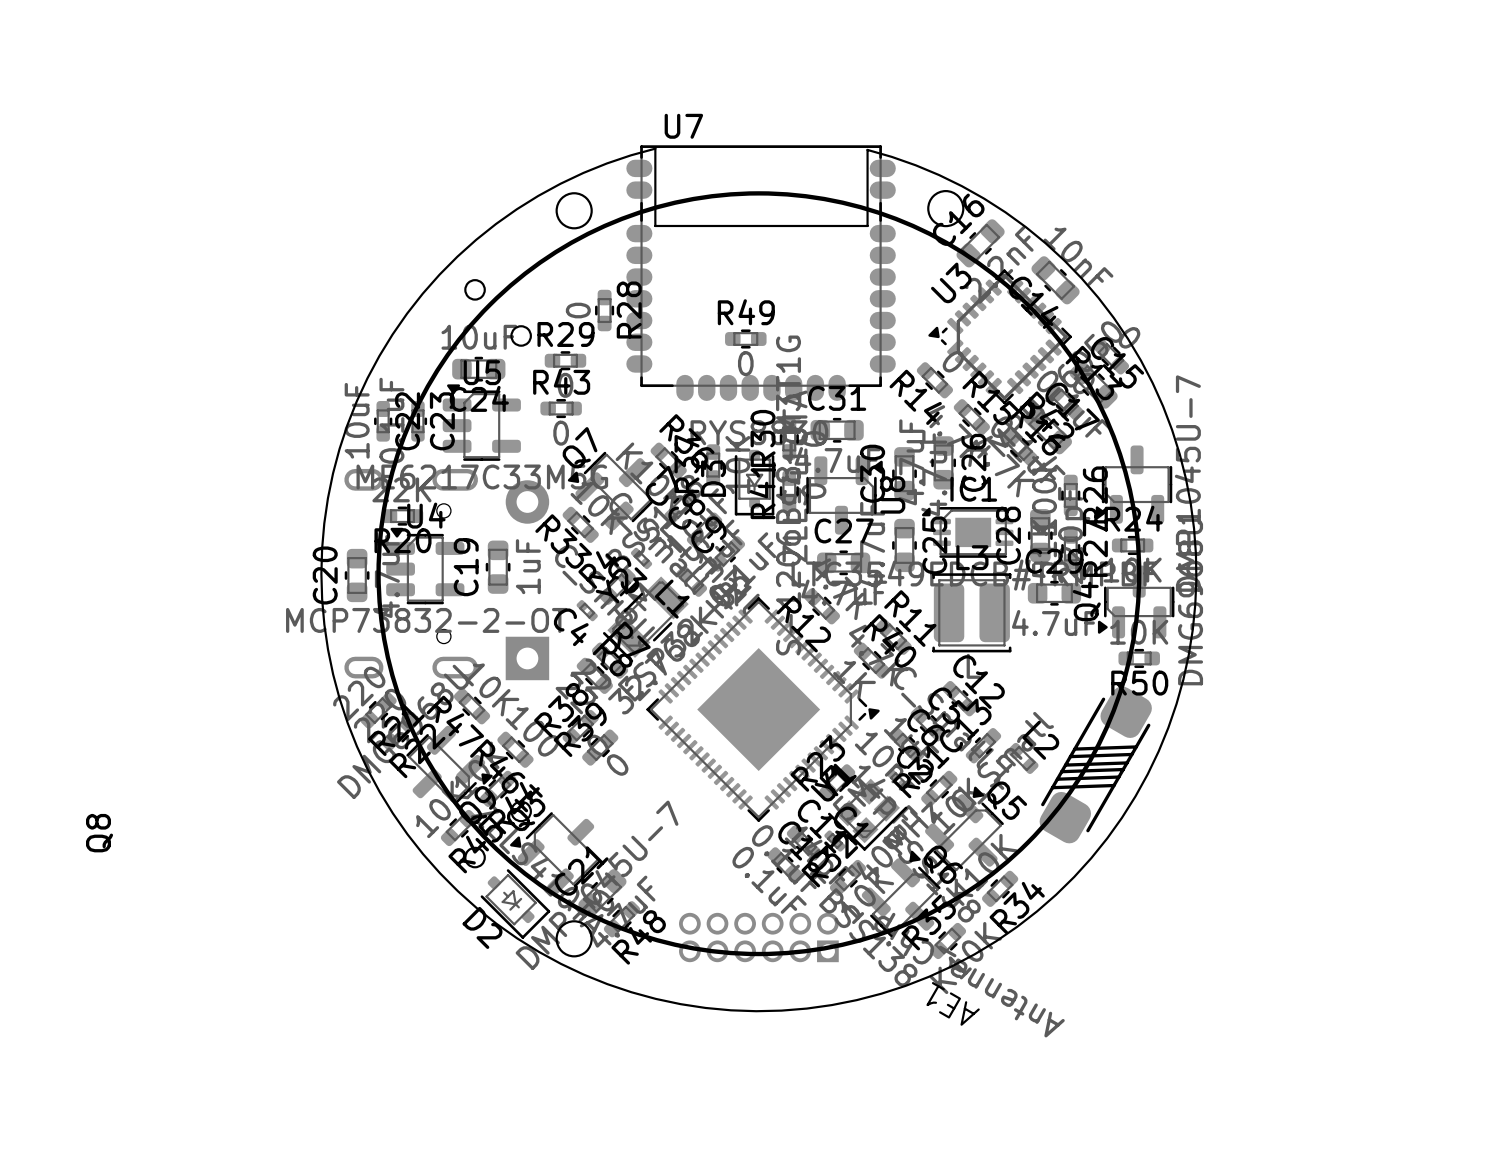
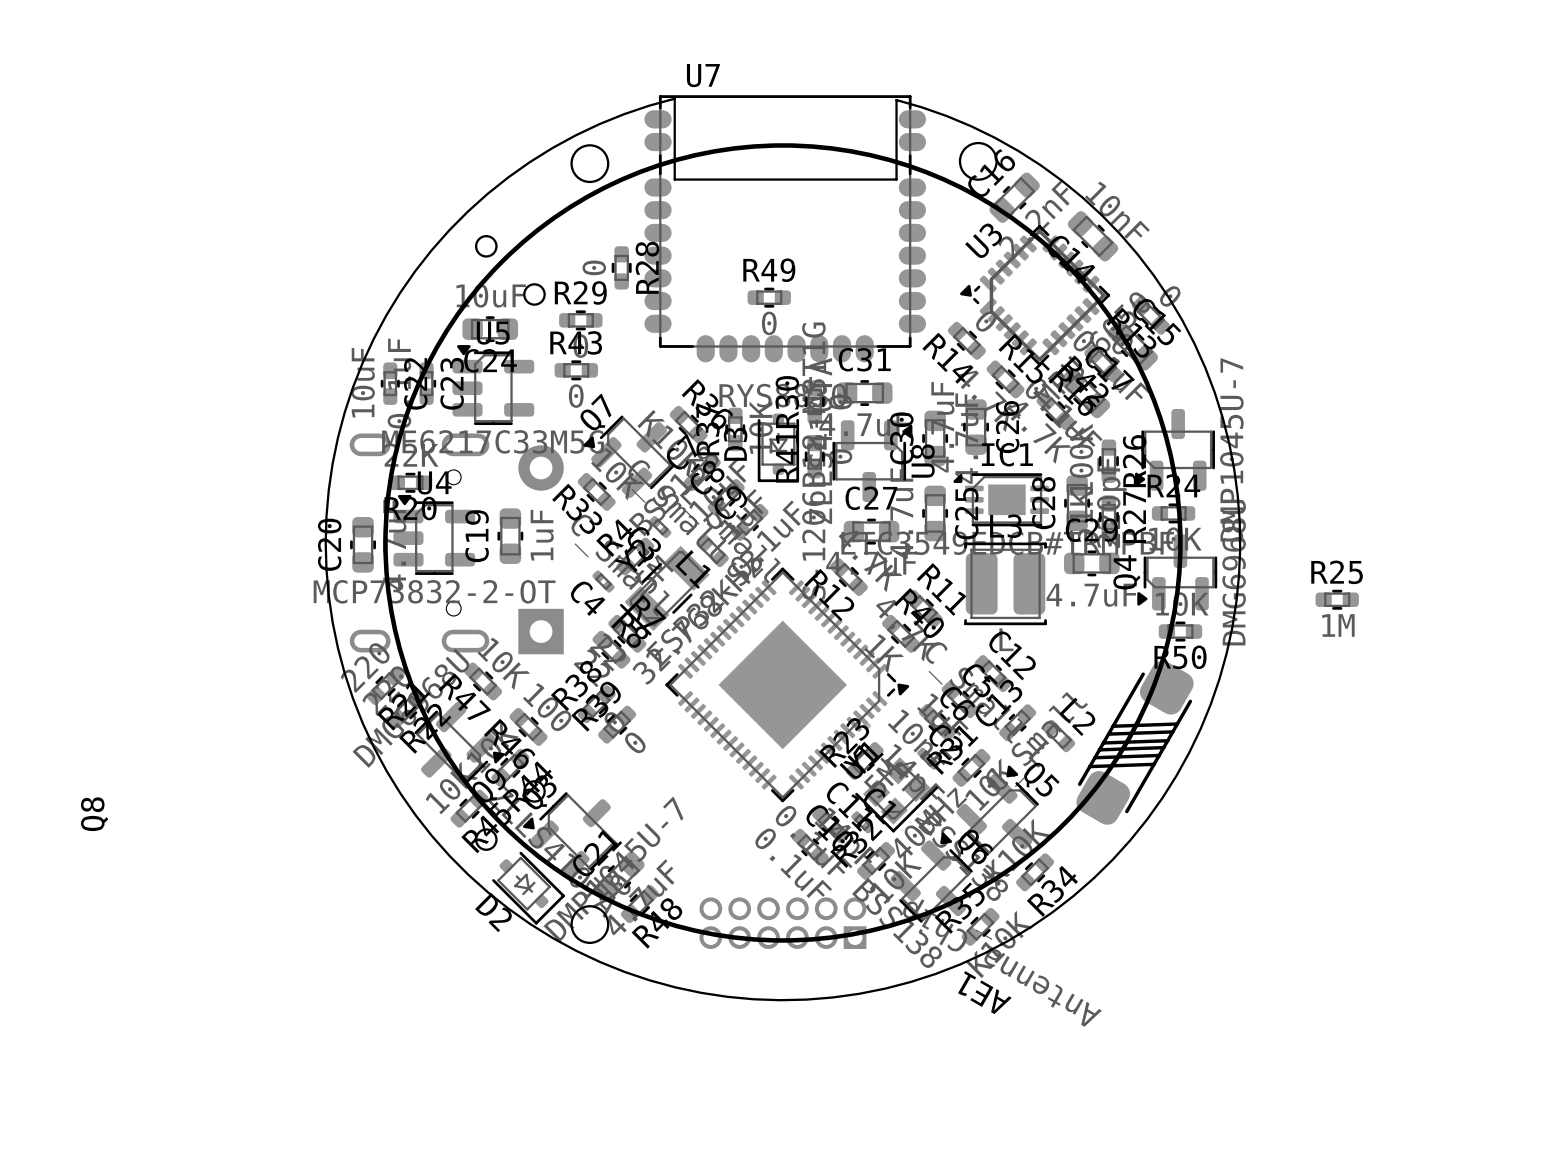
R25: none -> 1M (1337, 599)

